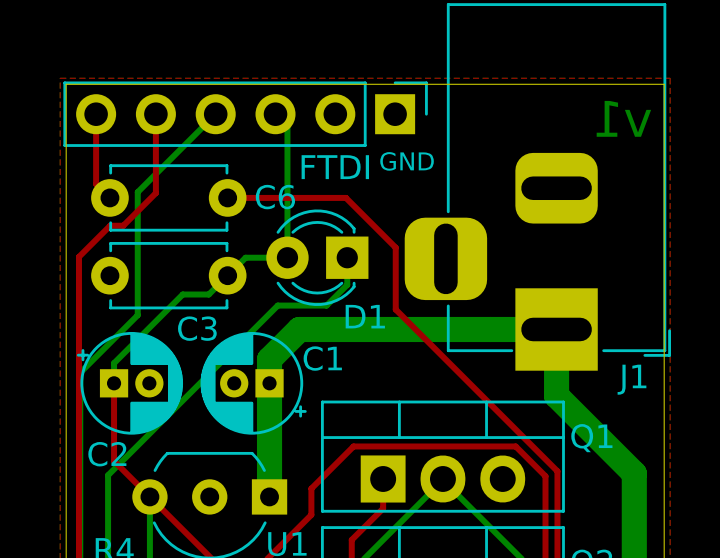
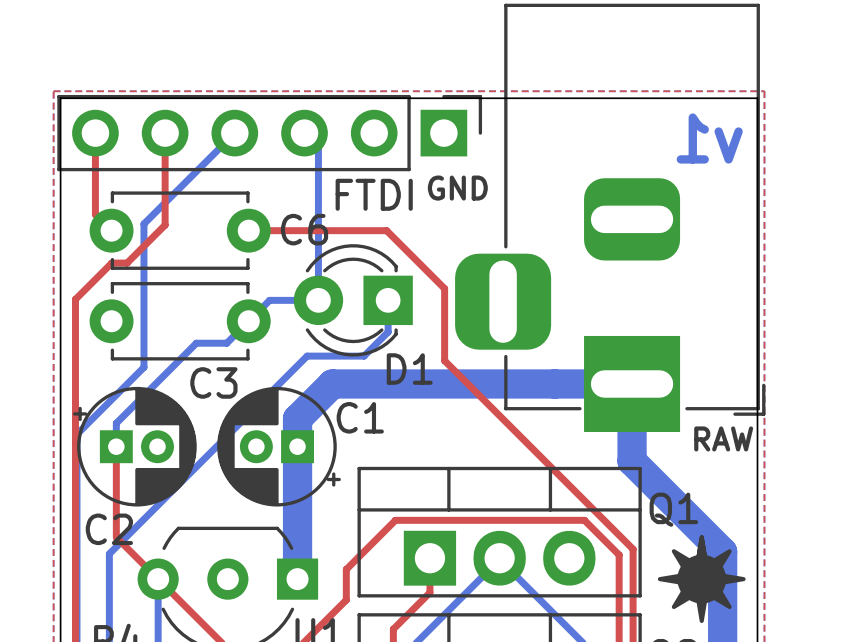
text: none -> RAW (723, 438)
J1 name: J1 (631, 379) -> none
drawing: none -> [657, 535, 746, 624]

